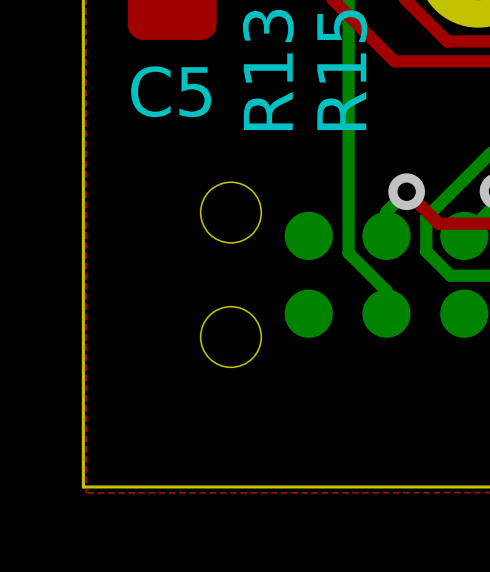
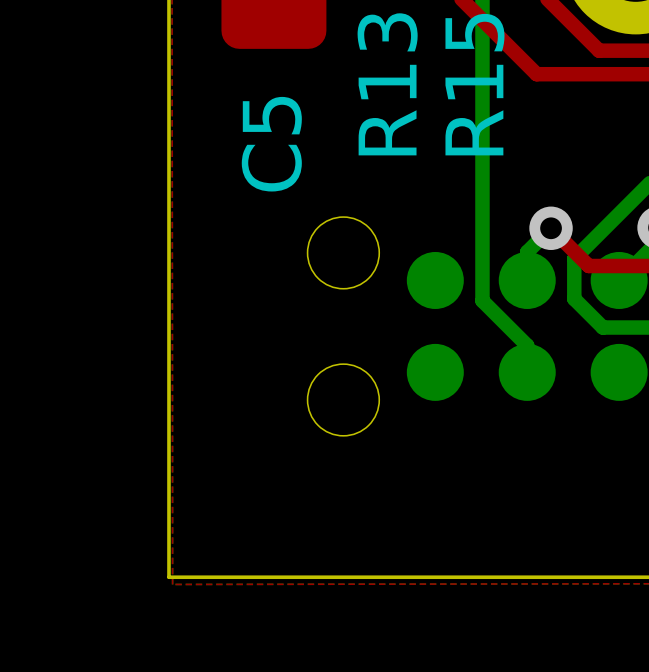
C5 name rotation: 0° (171, 91) -> 90° counterclockwise (271, 144)

